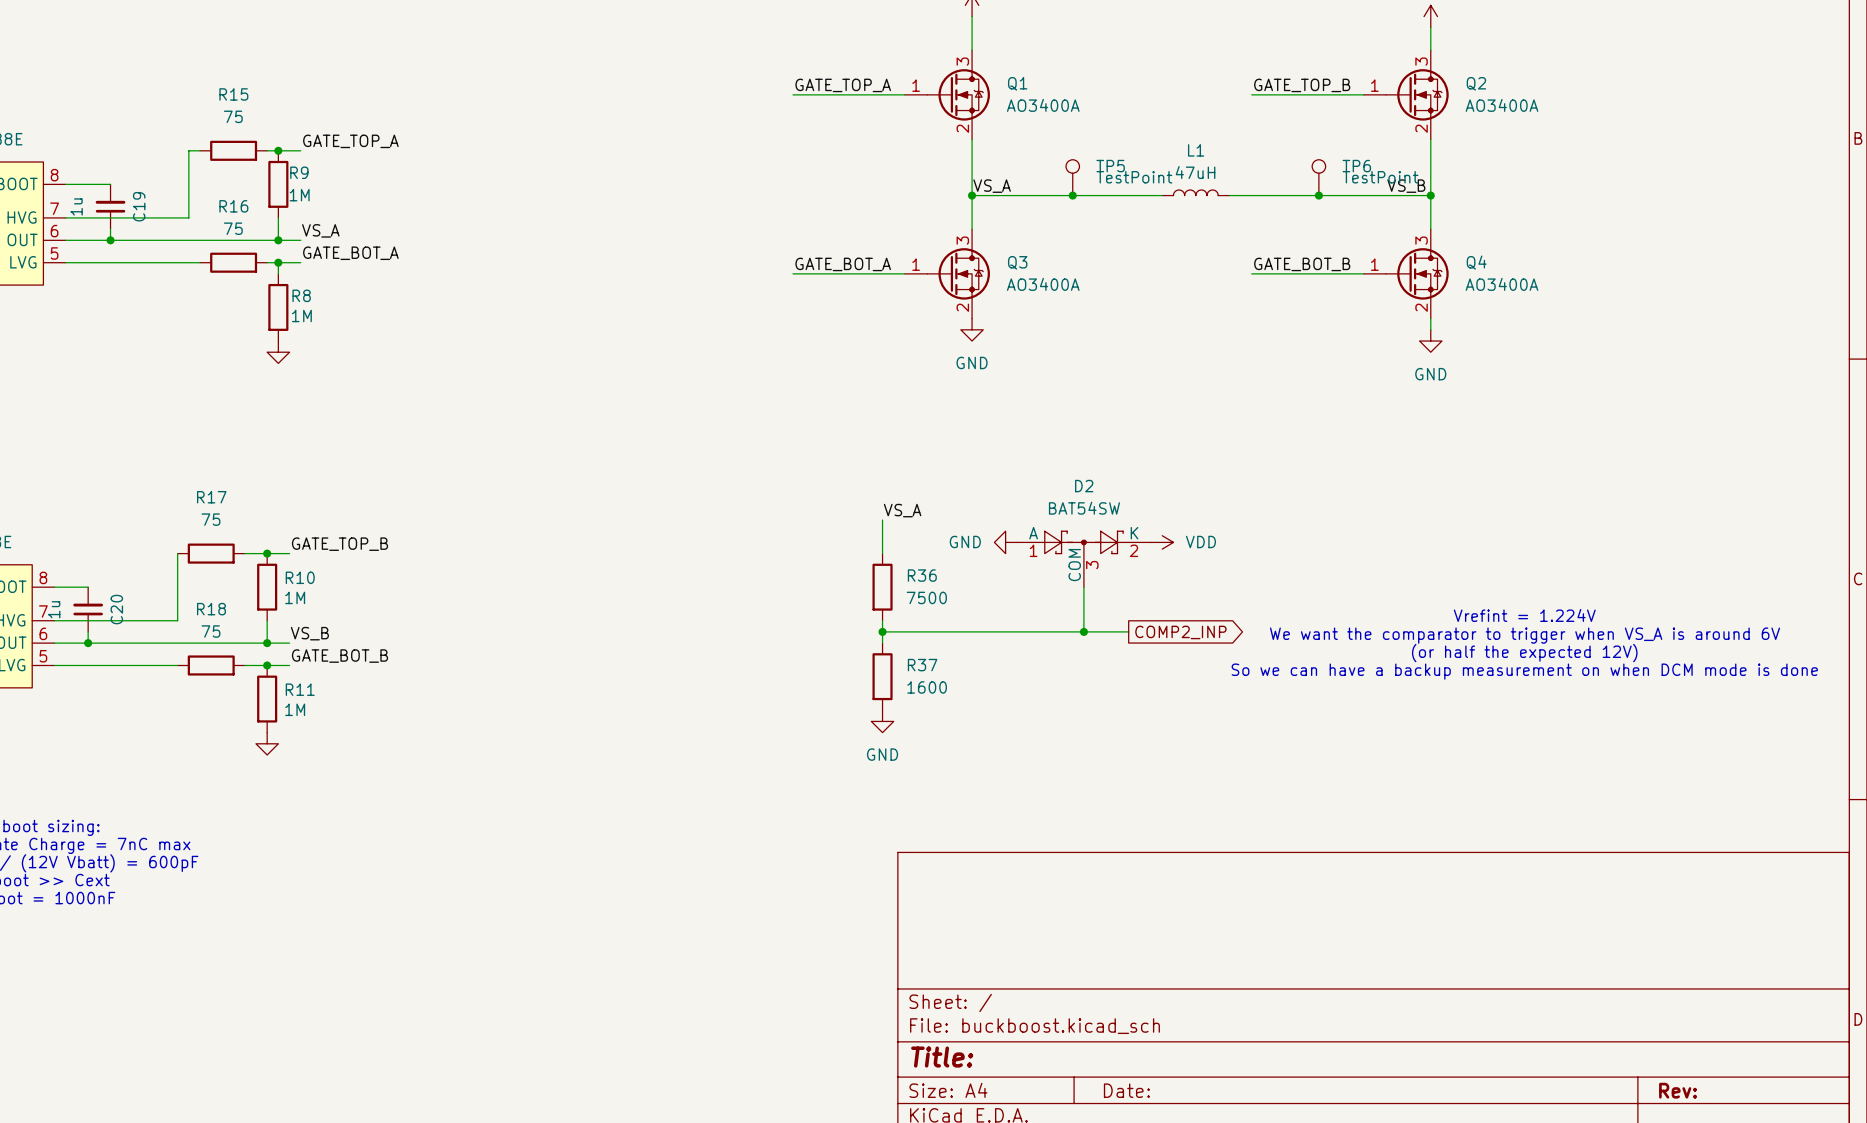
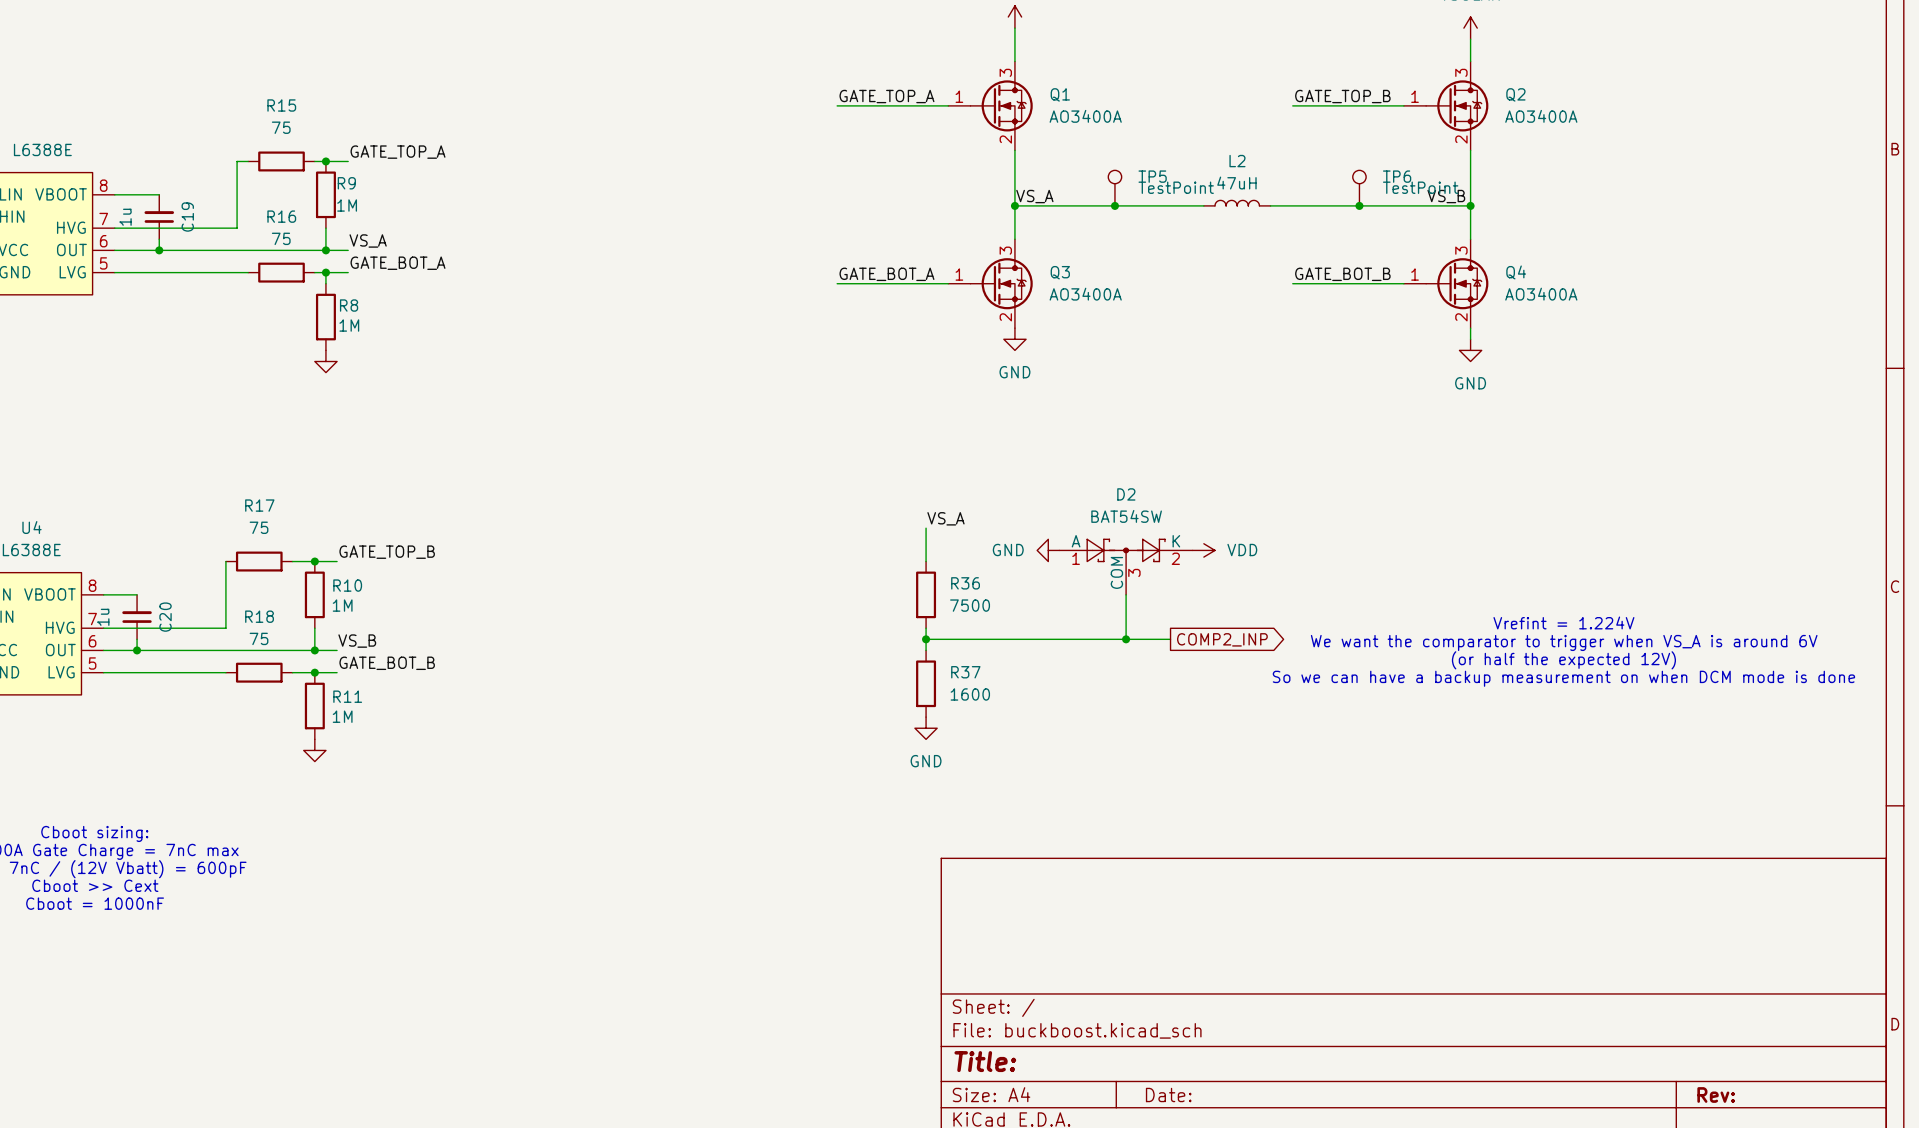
L1 name: L1 (1196, 150) -> L2 (1237, 161)

